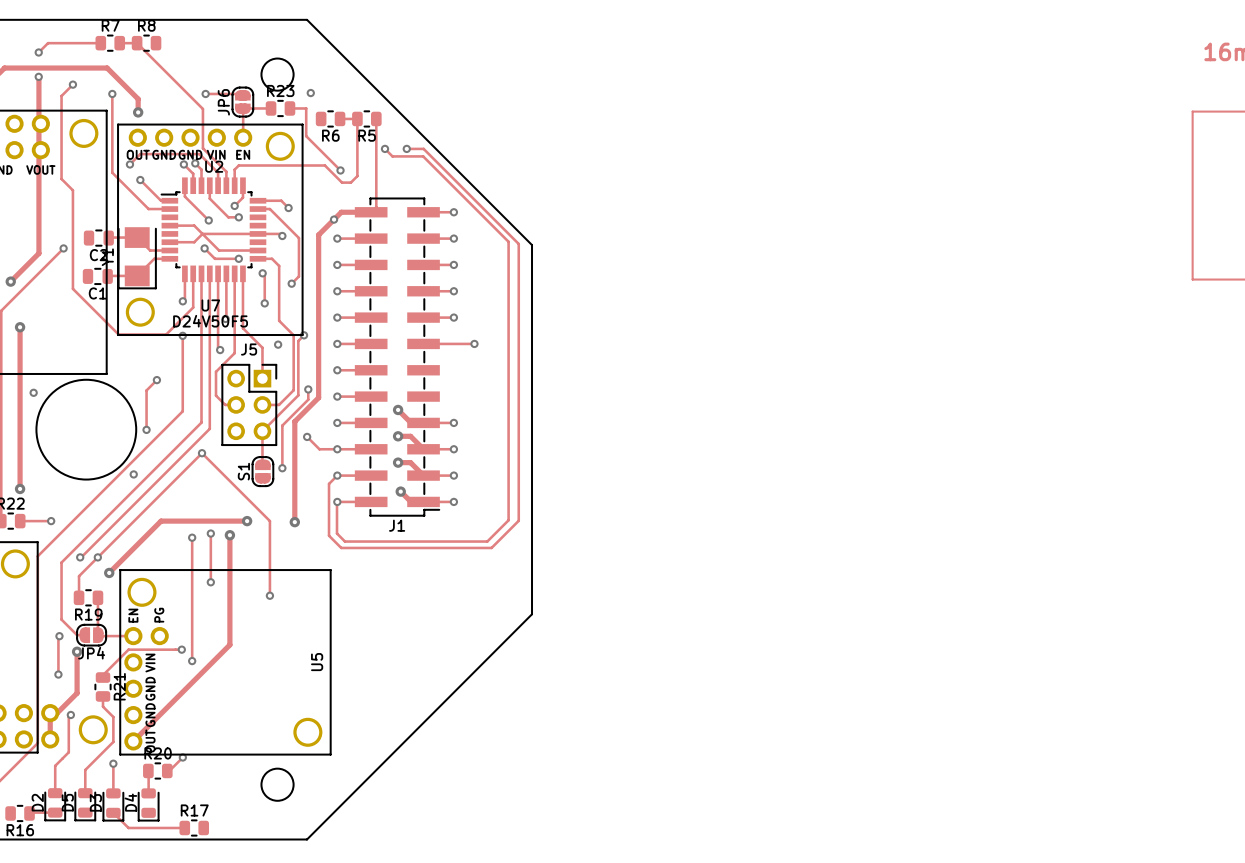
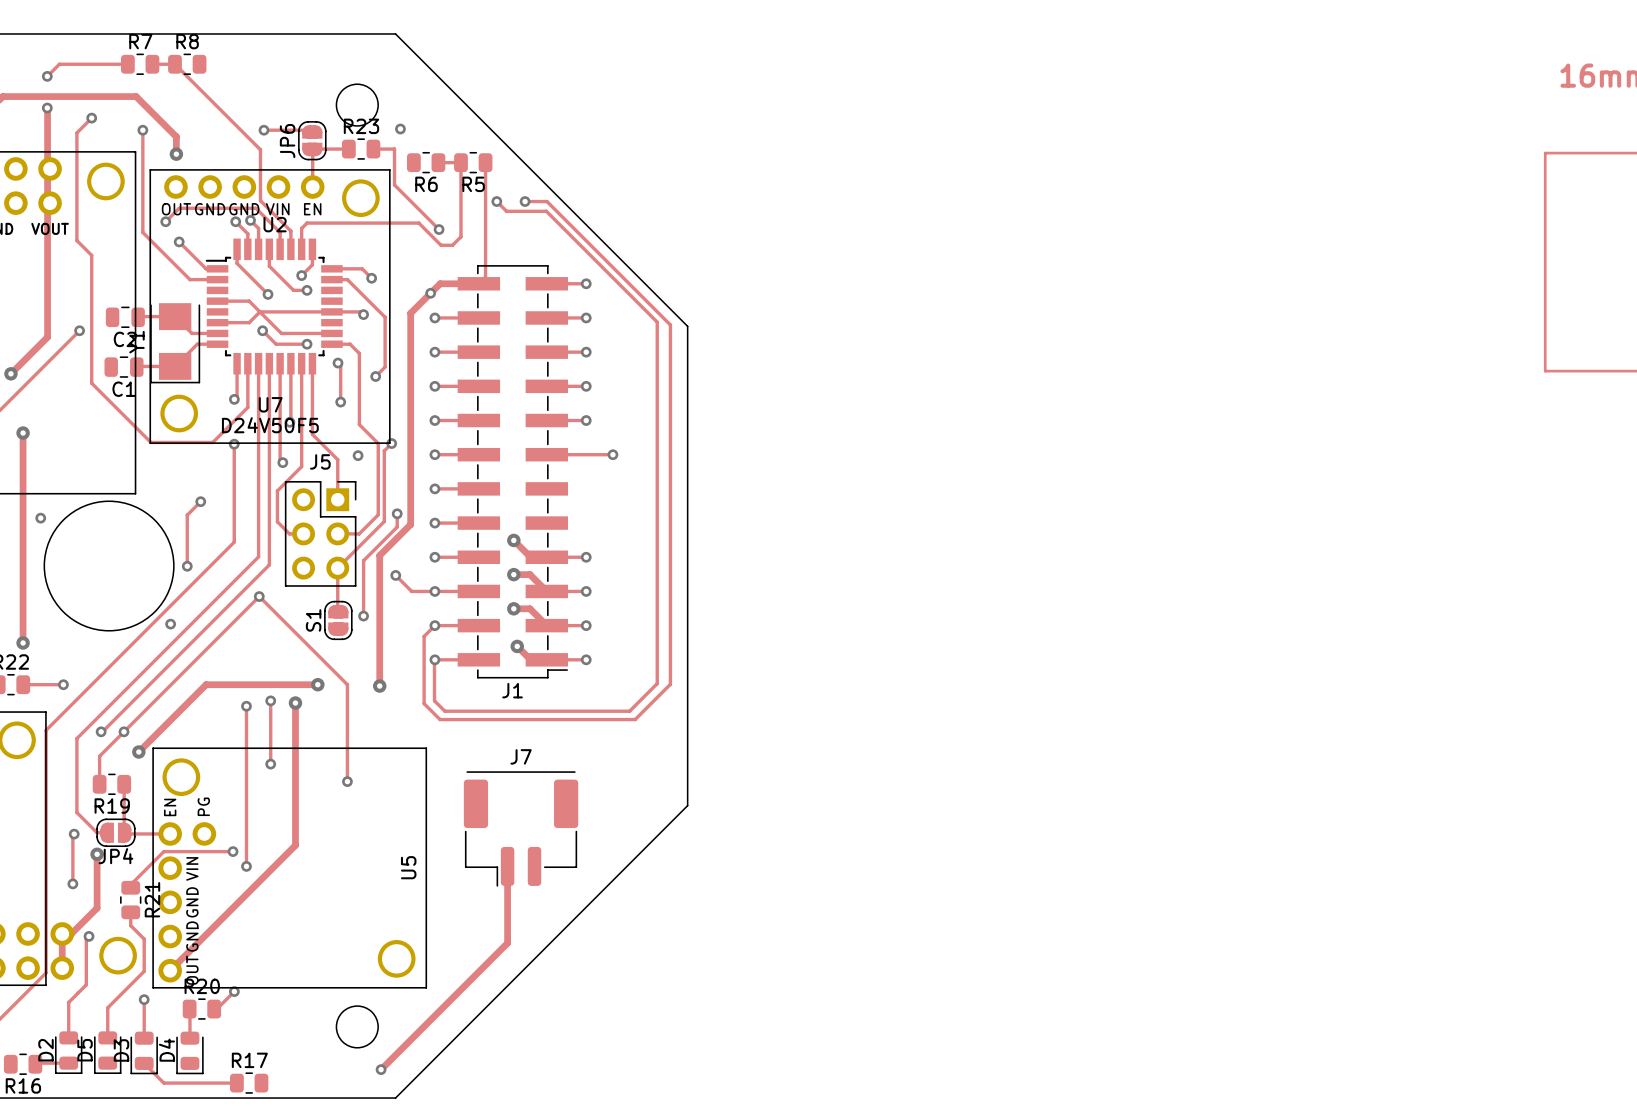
J7: none -> (521, 828)
track: none -> (507, 866) (507, 943) (381, 1069)
via: none -> (381, 1069)

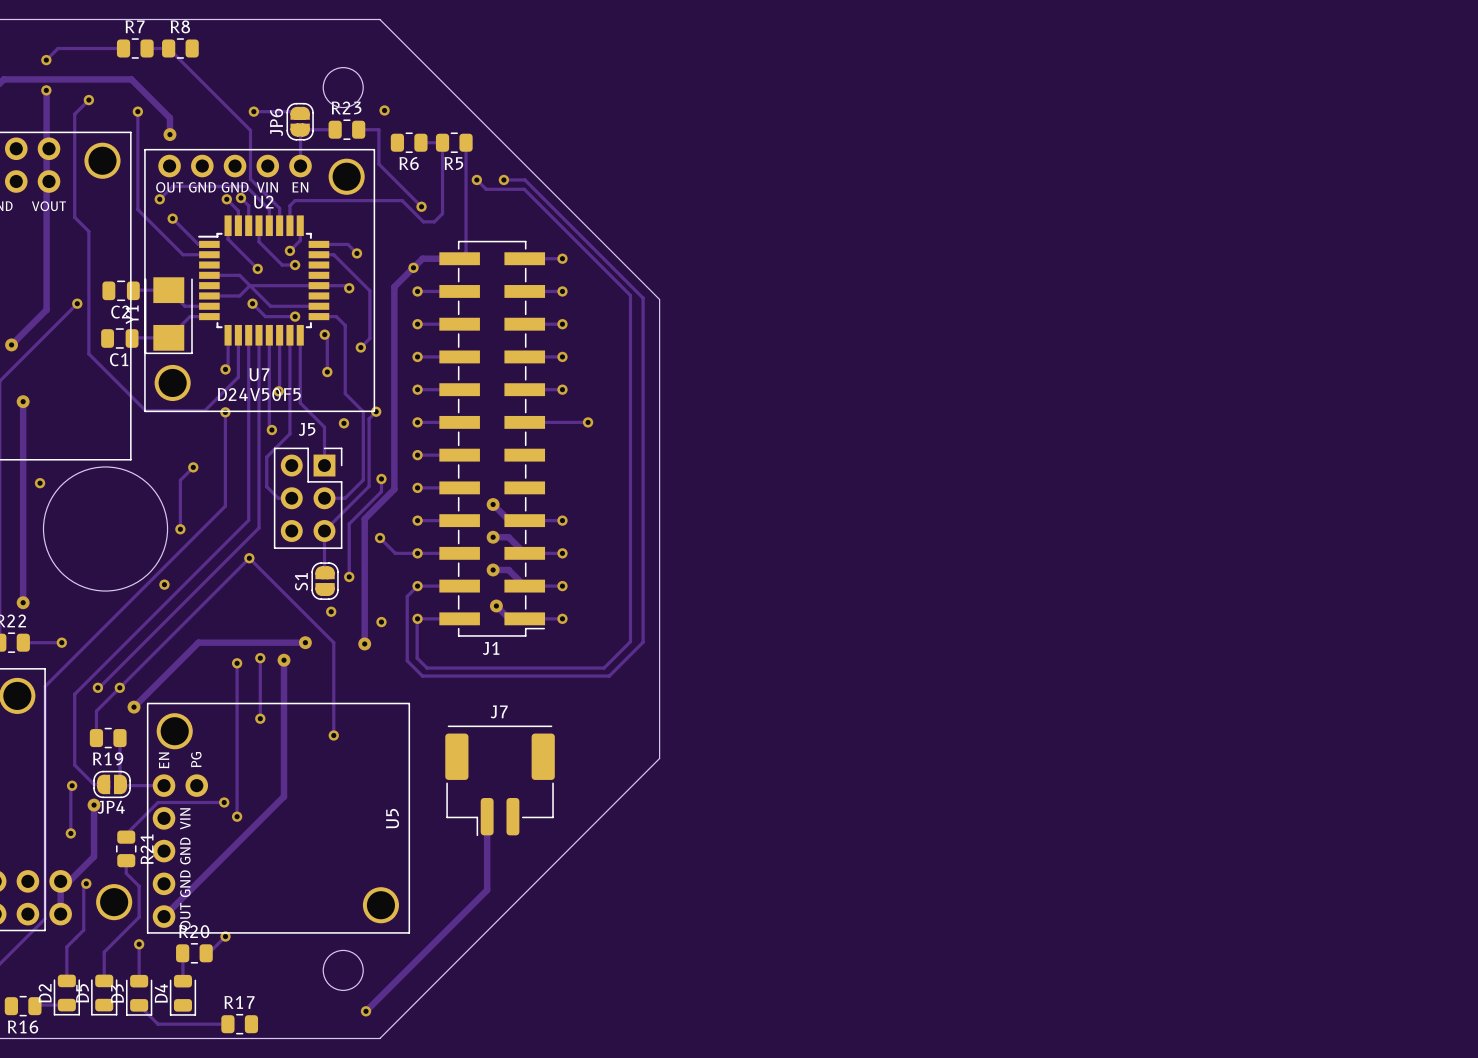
via: none -> (331, 611)
via: none -> (381, 622)

